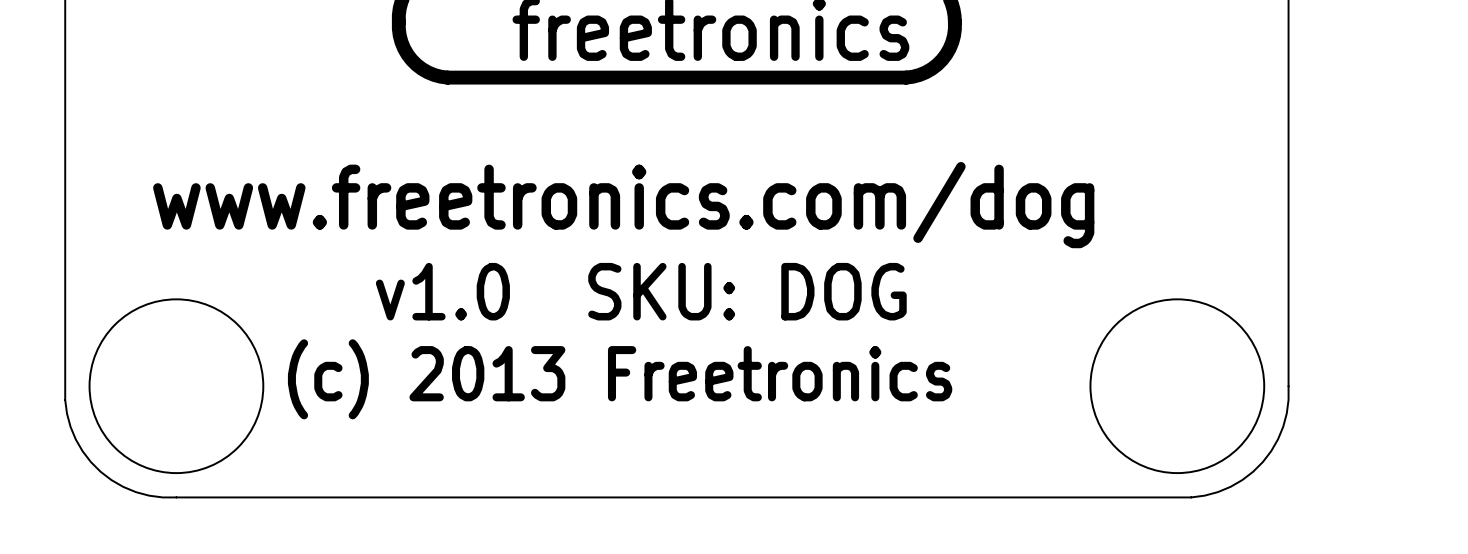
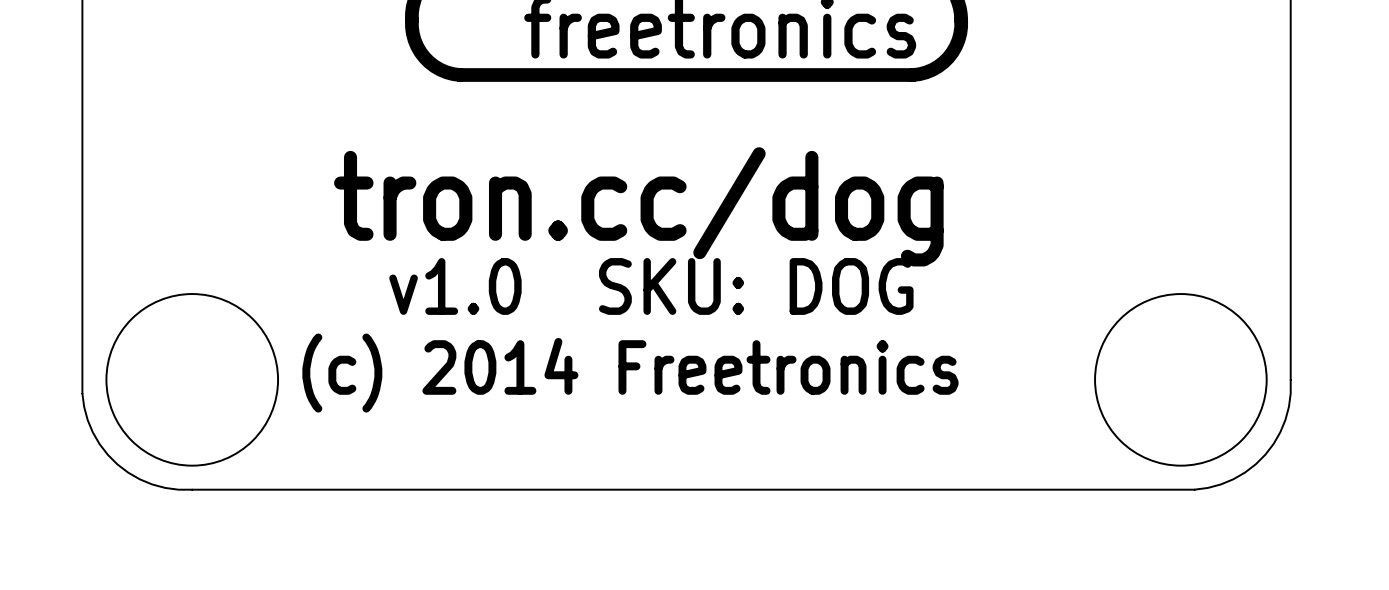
text: www.freetronics.com/dog (623, 205) -> none
text: none -> tron.cc/dog (638, 206)
text: (c) 2013 Freetronics (620, 379) -> (c) 2014 Freetronics (630, 373)

